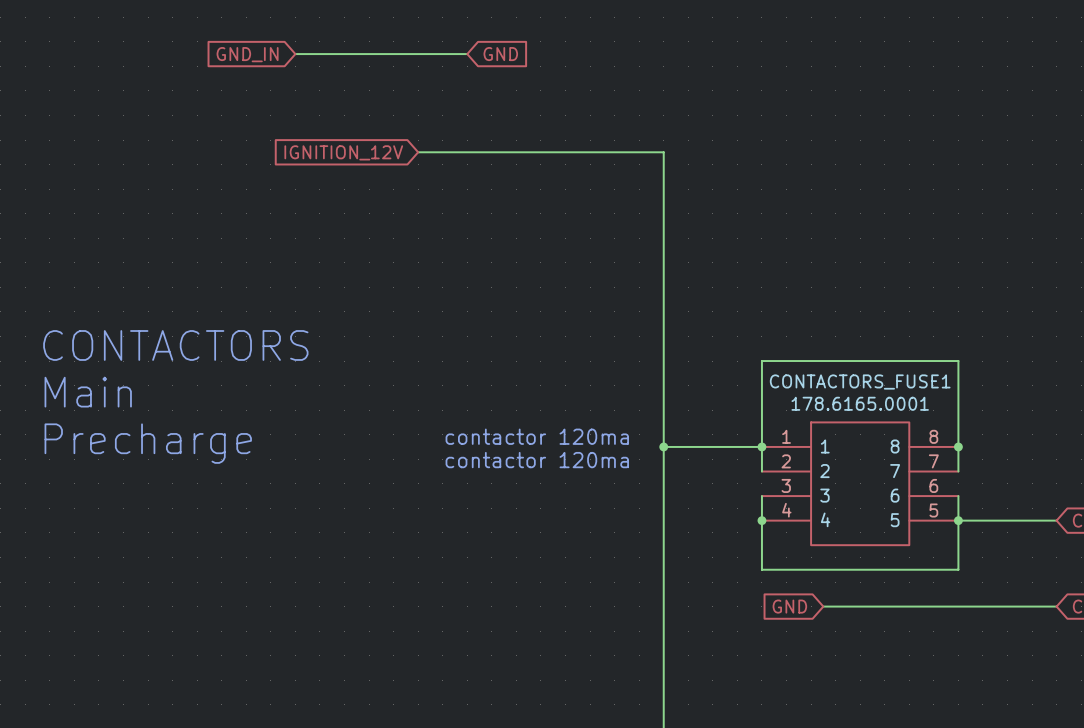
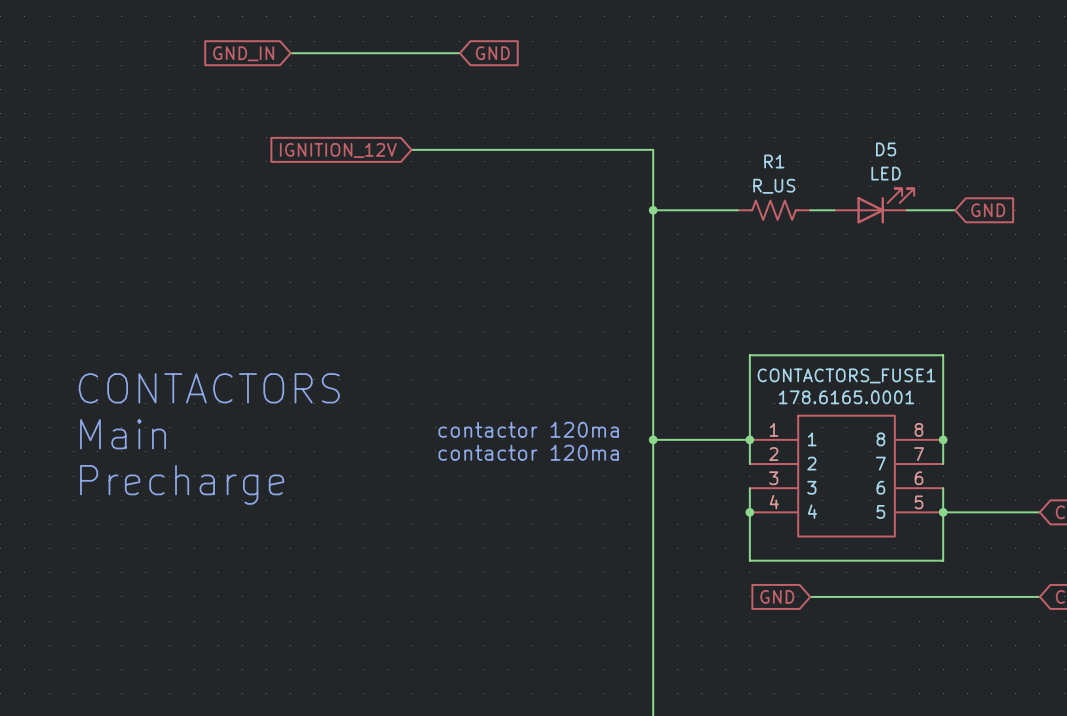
D5: none -> LED (874, 206)
wire: none -> (653, 210) (737, 210)
junction: none -> (653, 210)
R1: none -> R_US (774, 210)
wire: none -> (810, 210) (834, 210)
wire: none -> (906, 210) (955, 210)
global label: none -> GND (988, 210)
text position: CONTACTORS (175, 345) -> CONTACTORS (209, 388)
text position: Main (88, 392) -> Main (123, 434)
text position: Precharge (148, 443) -> Precharge (182, 484)

